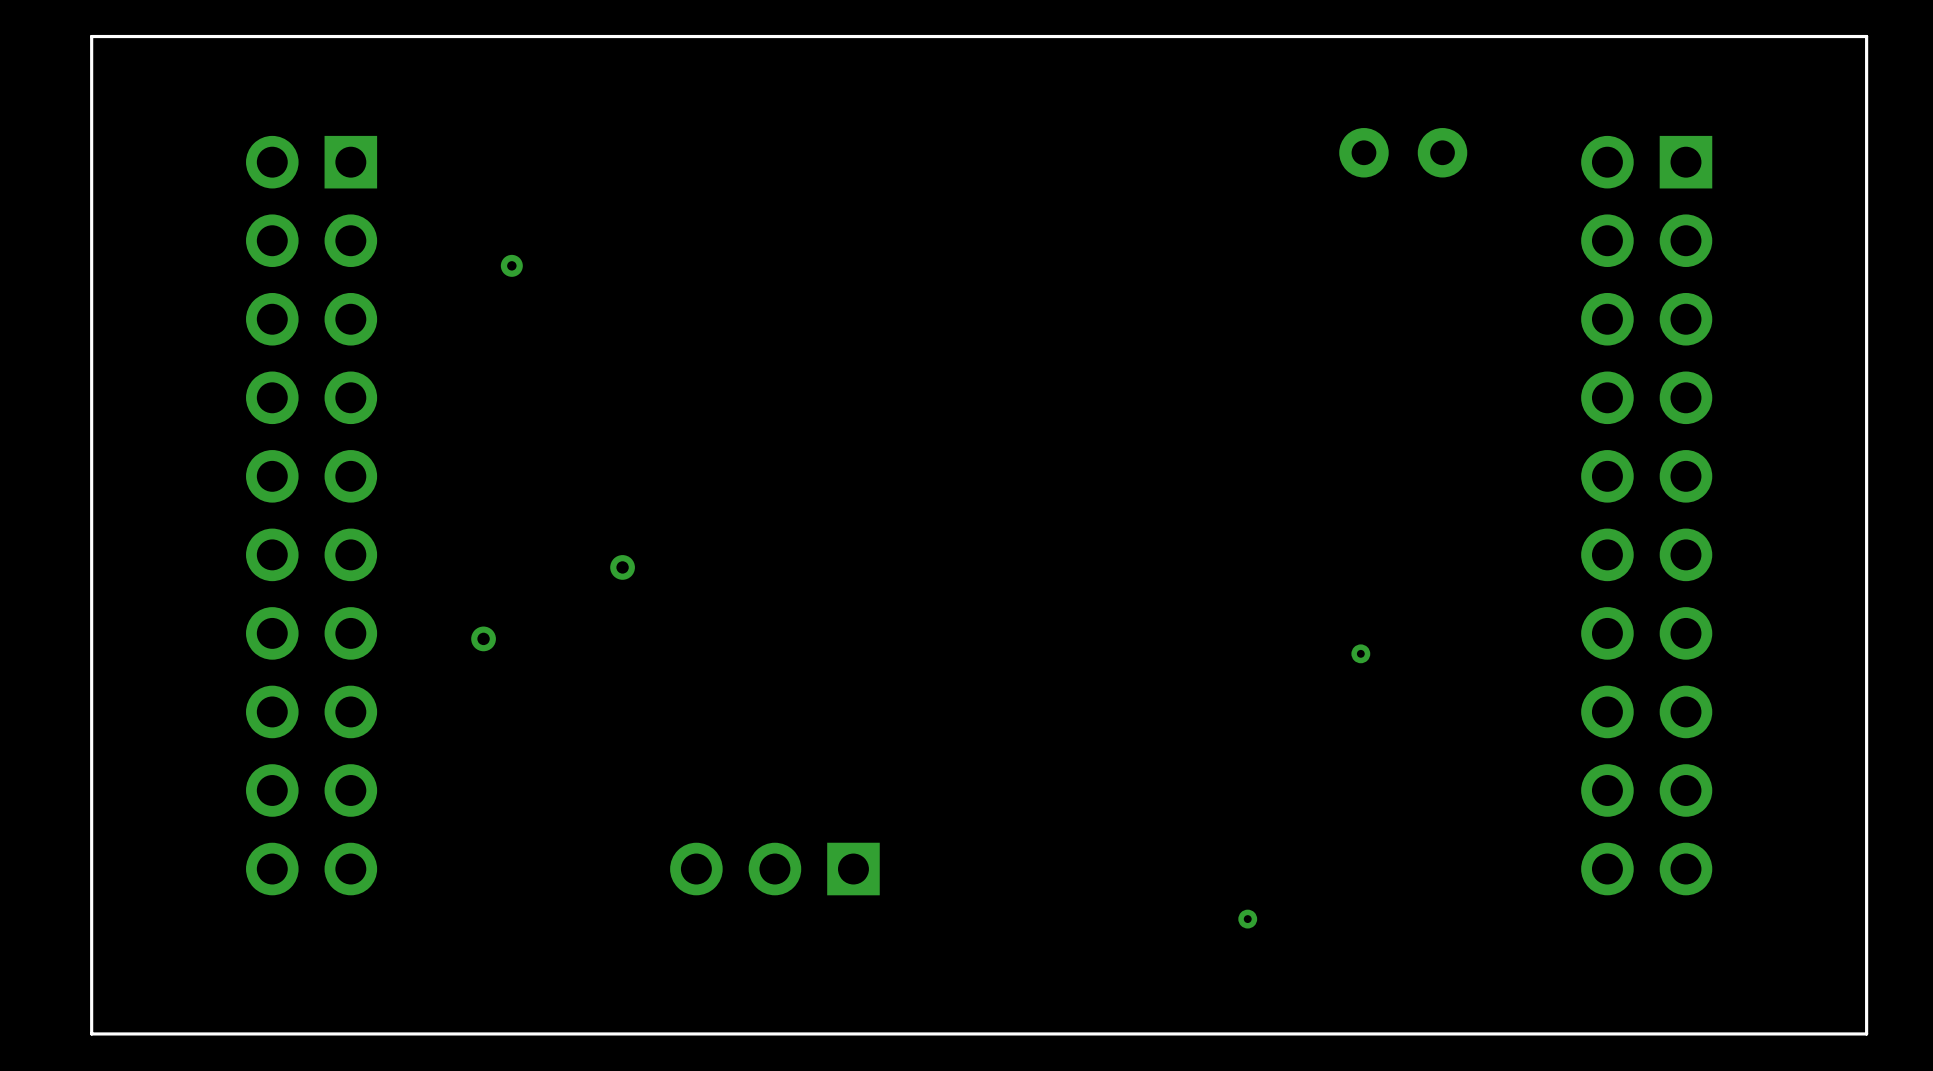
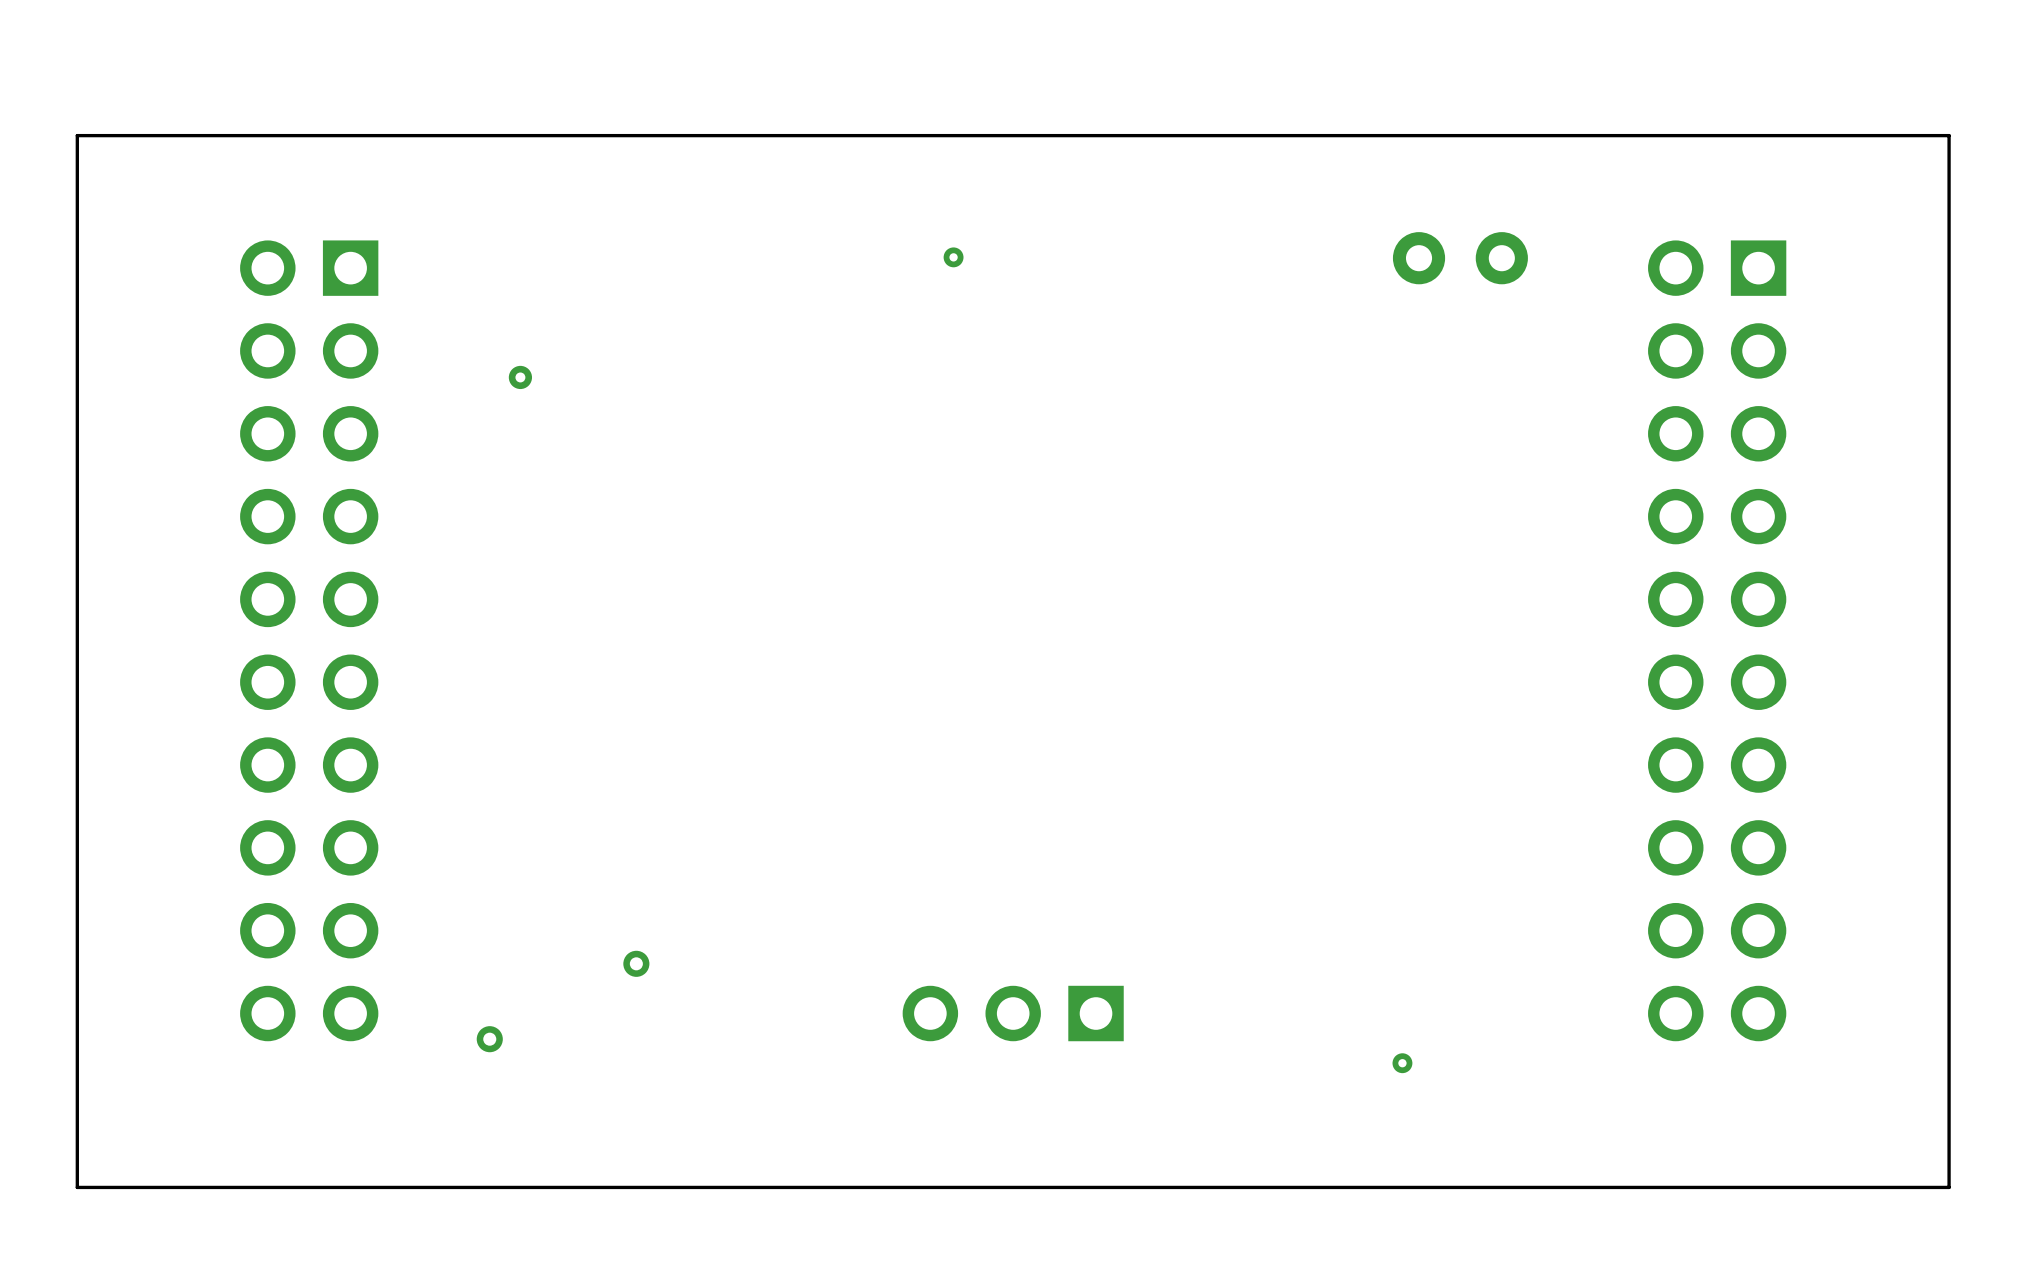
via: none -> (953, 257)
via: (622, 567) -> none
via: (483, 638) -> none
via: (1360, 653) -> none
via: none -> (636, 963)
part position: (774, 869) -> (1013, 1013)
via: none -> (489, 1039)
via position: (1247, 919) -> (1402, 1063)

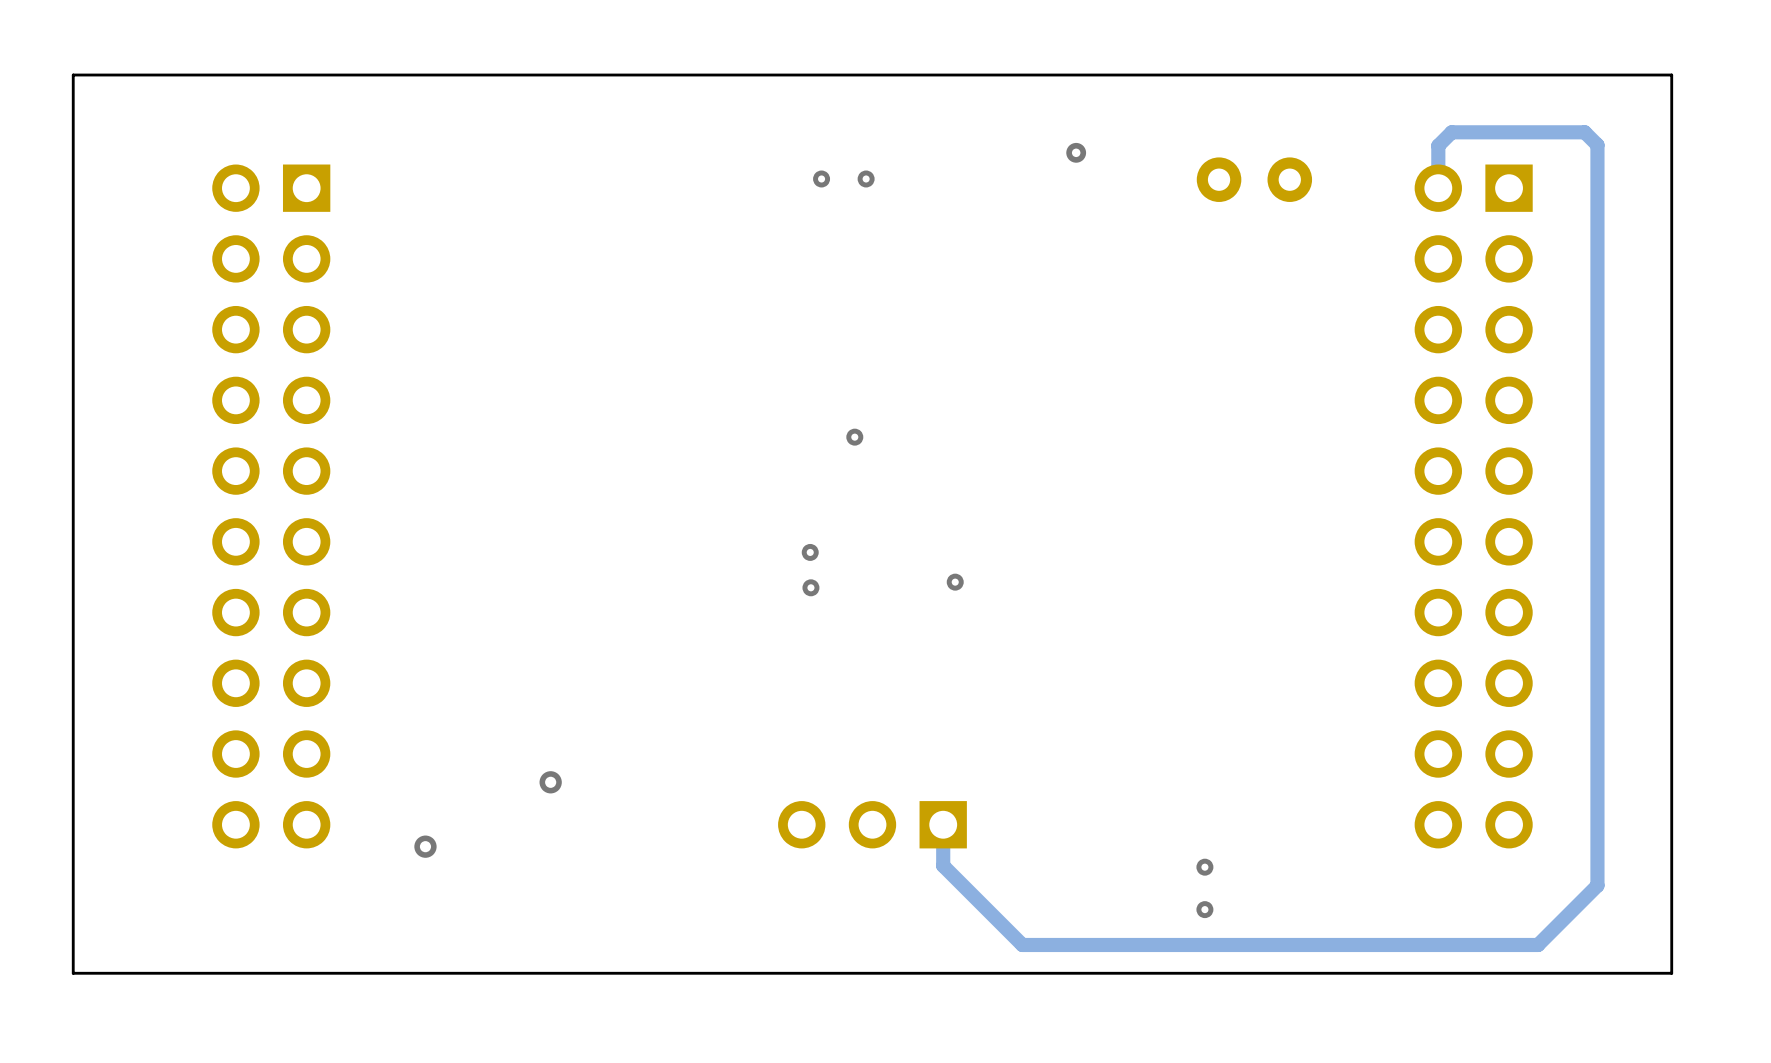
via: none -> (1076, 152)
via: none -> (866, 178)
track: none -> (1438, 188) (1438, 145) (1451, 132) (1584, 132) (1597, 145) (1597, 885) (1538, 944) (1022, 944) (943, 865) (943, 824)
via: (520, 377) -> none
via: none -> (854, 437)
via: none -> (810, 552)
via: none -> (955, 582)
via: none -> (810, 587)
via: none -> (1204, 909)

